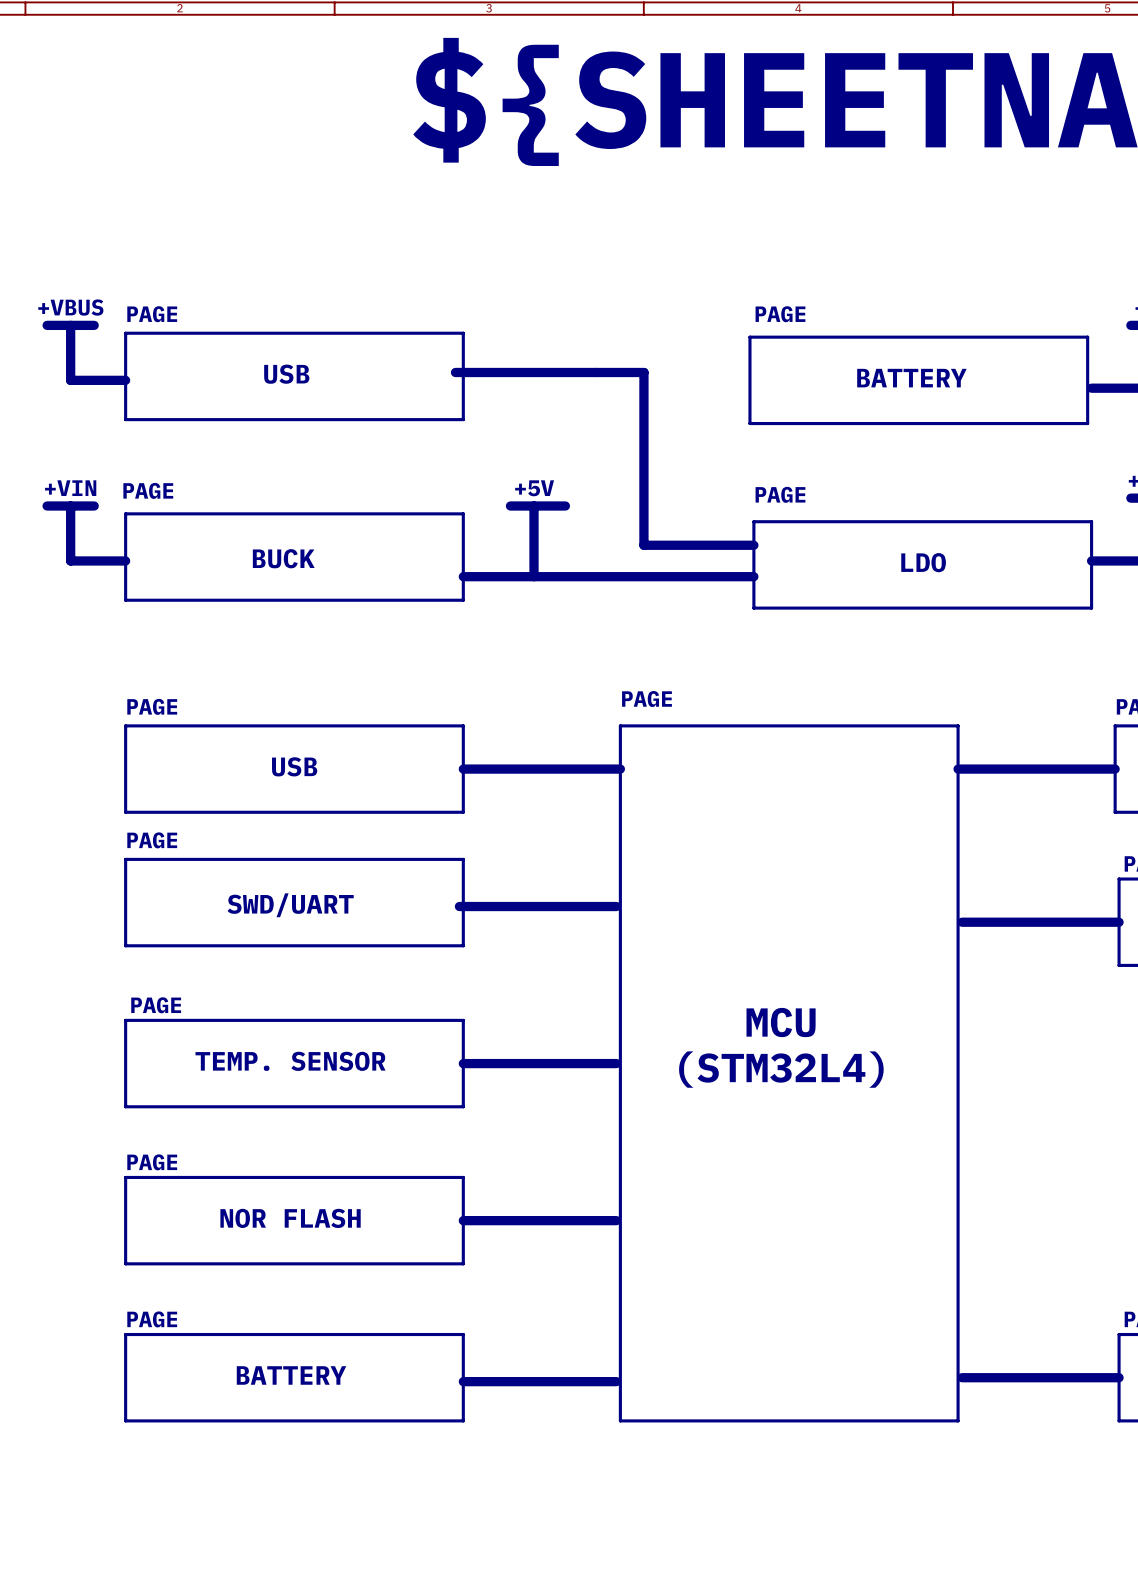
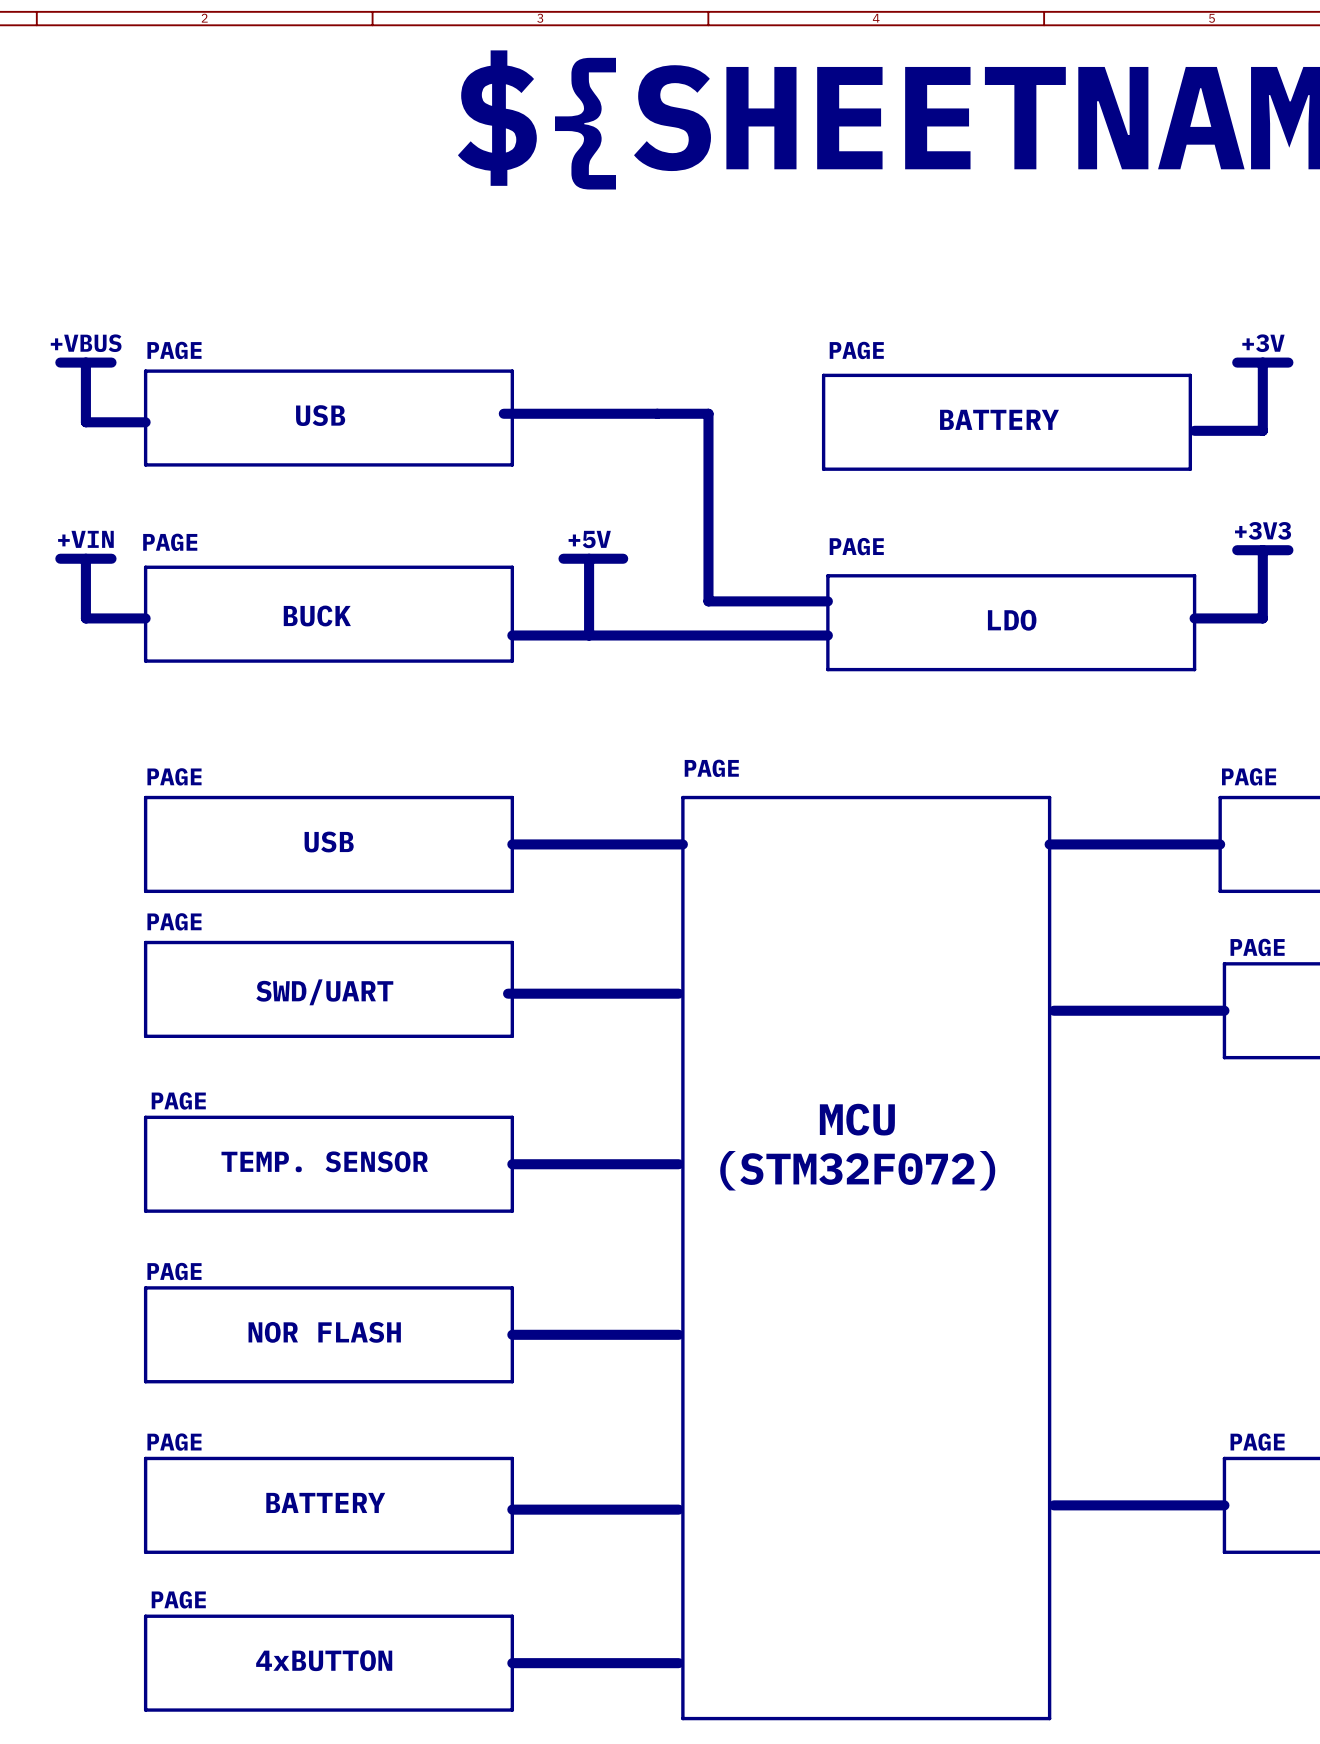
text: (STM32L4) (781, 1069) -> (STM32F072) (857, 1170)
line: (620, 1420) (958, 1420) -> (682, 1552) (682, 1718) (1049, 1718) (1049, 1552)
text: none -> PAGE (178, 1599)
line: none -> (145, 1616) (145, 1710) (512, 1710) (512, 1616) (145, 1616)
text: none -> 4xBUTTON (324, 1660)
line: none -> (512, 1663) (678, 1663)

